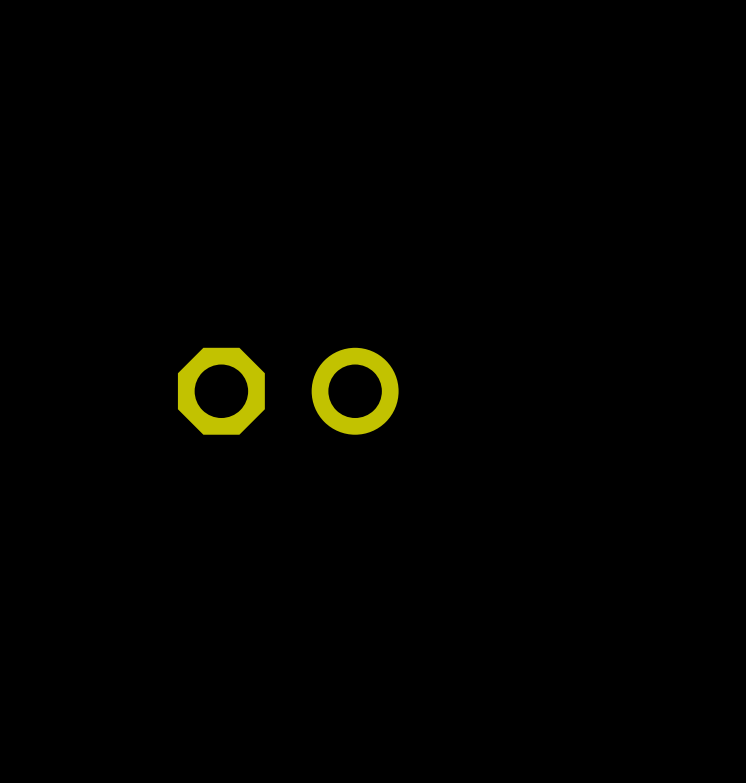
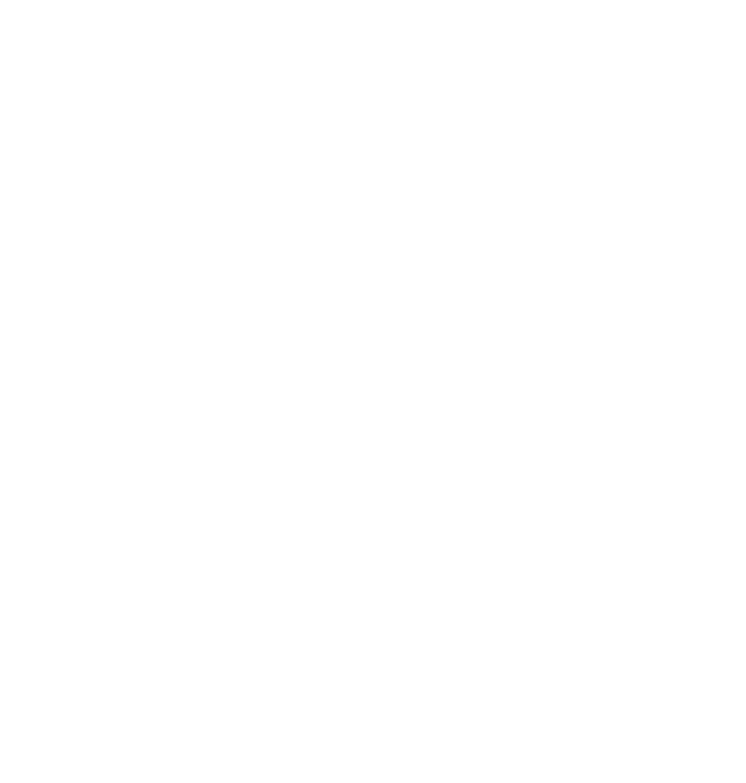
part: (288, 391) -> none

